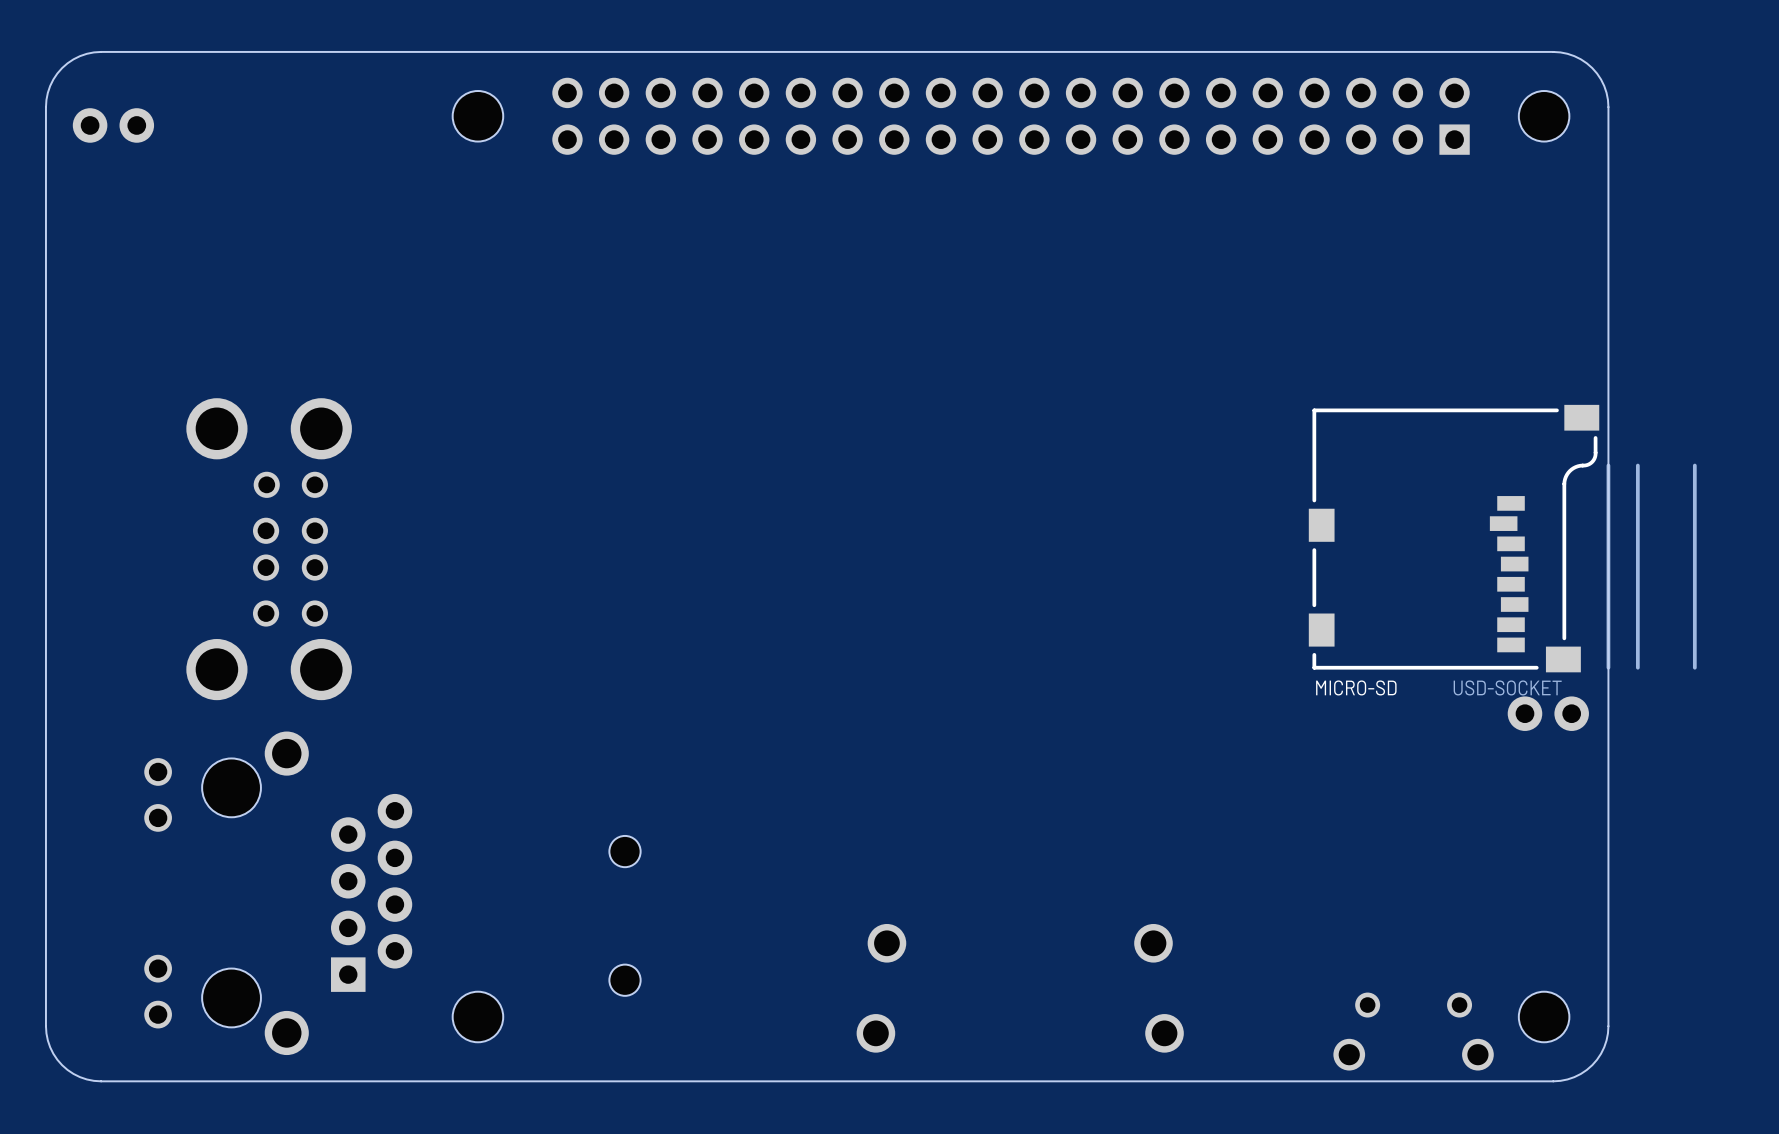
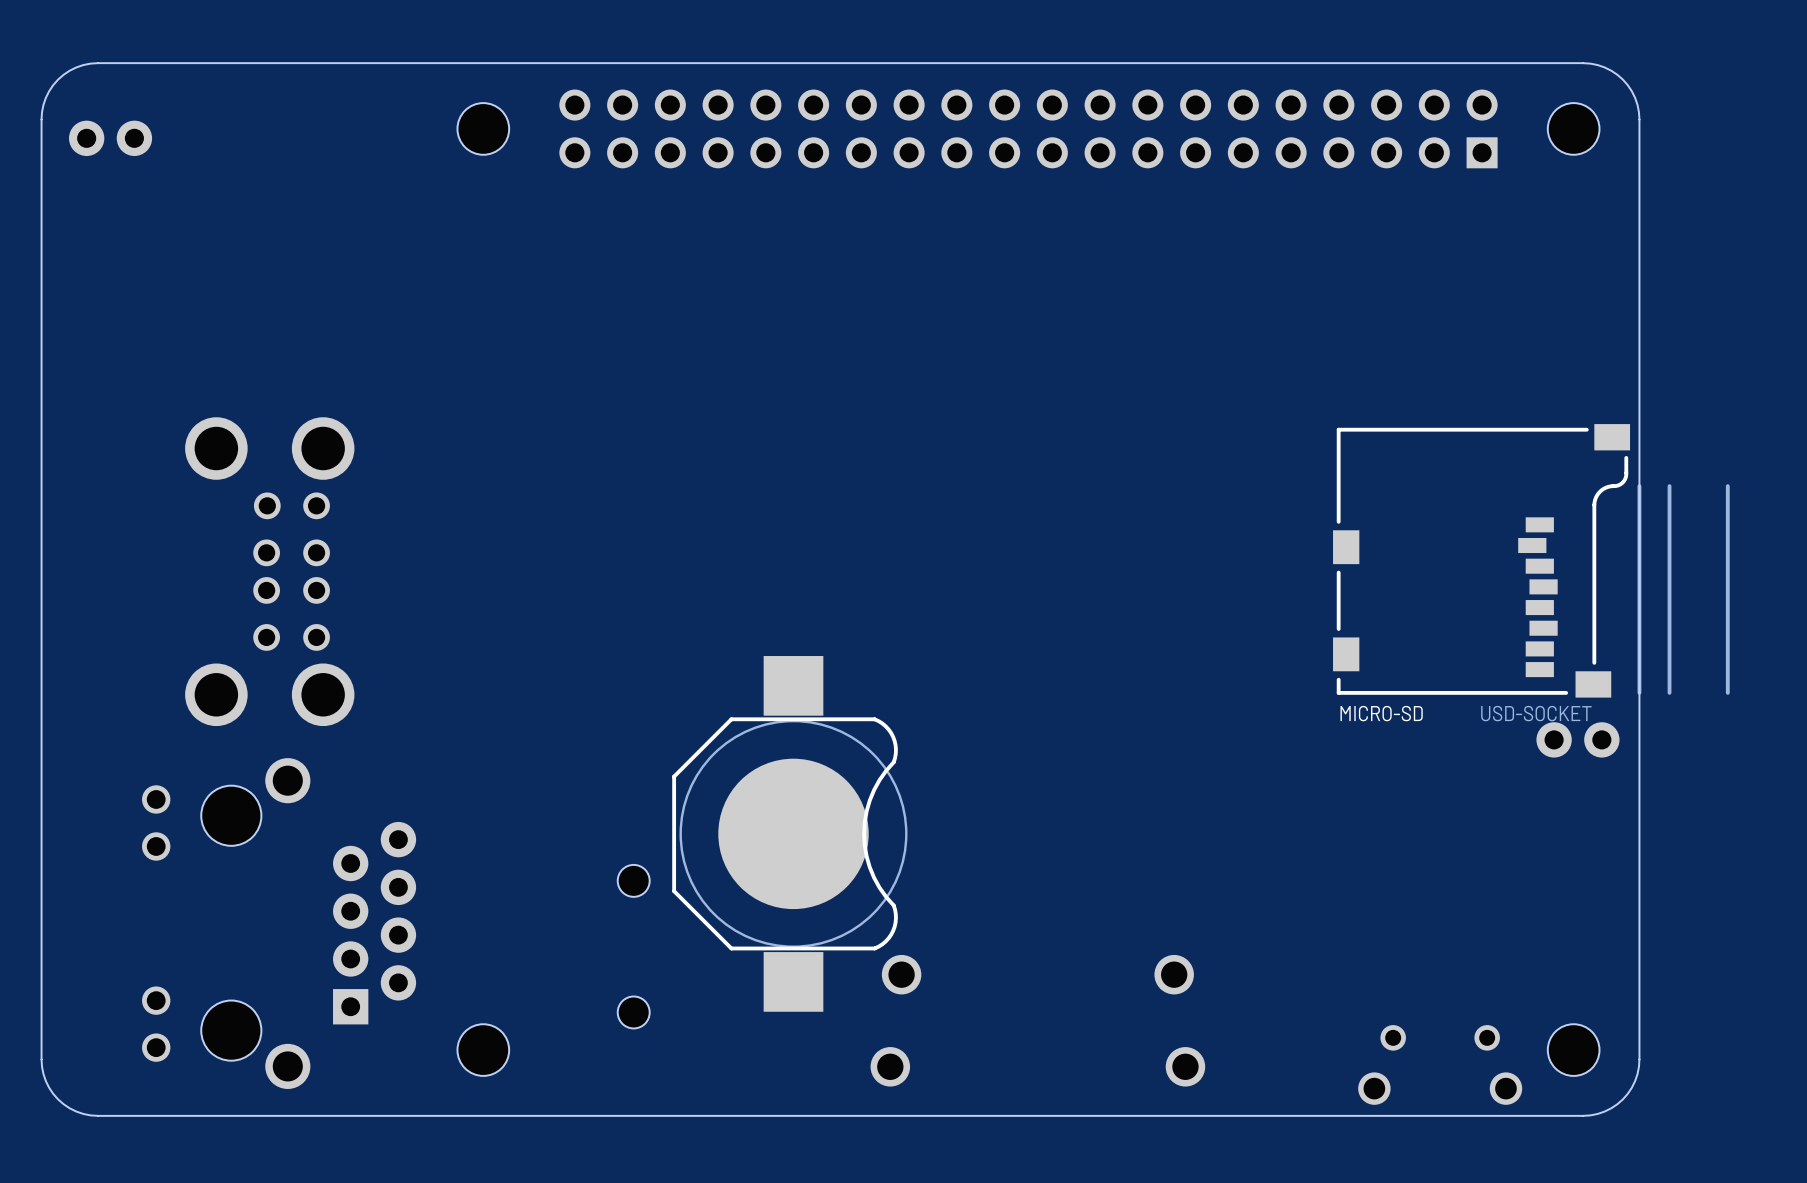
part: none -> (789, 833)

